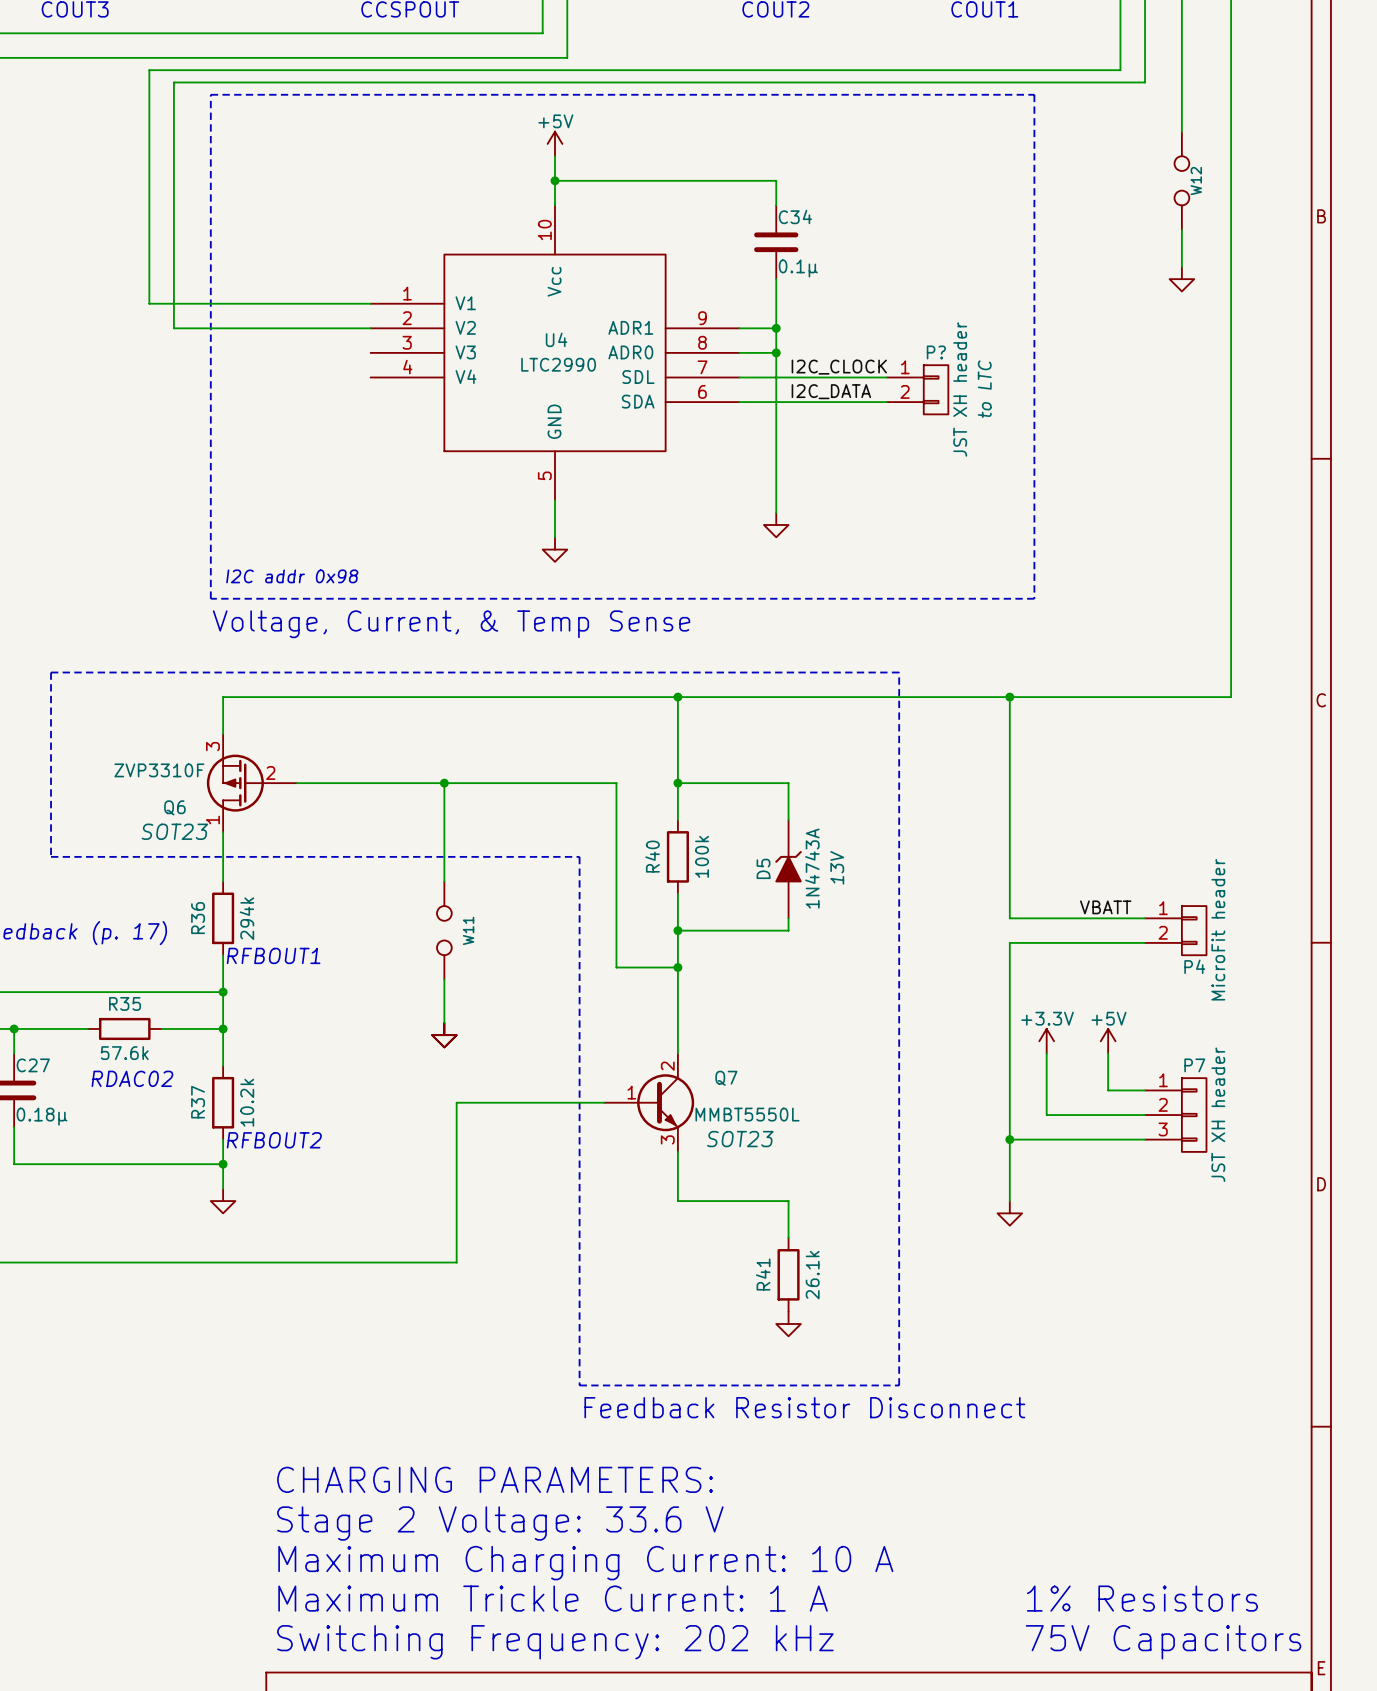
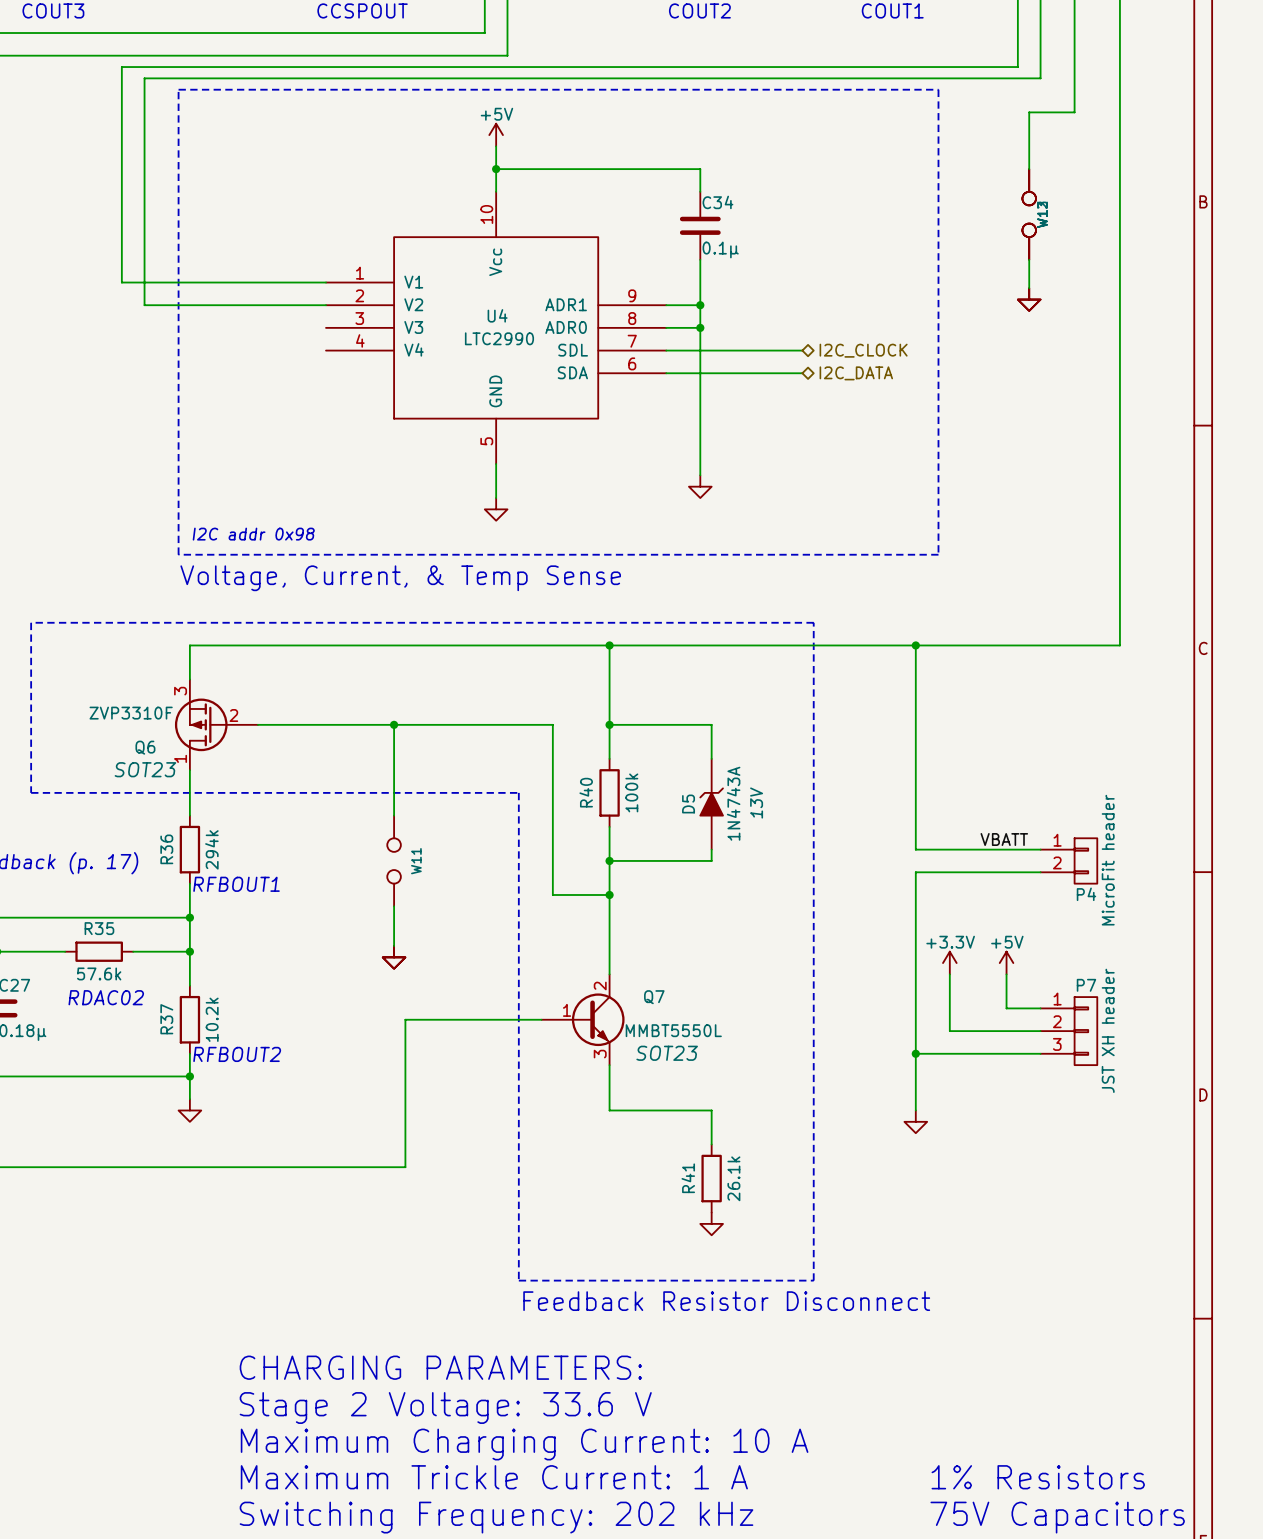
wire: (1181, 119) (1181, 131) -> (1074, 112) (1029, 112) (1029, 169)
W12 position: (1181, 180) -> (1029, 214)
part: none -> (1029, 214)
wire: (1181, 229) (1181, 266) -> none
wire: none -> (1029, 259) (1029, 288)
power symbol position: (1181, 279) -> (1029, 299)
label: I2C_CLOCK (839, 367) -> none
hierarchical label: none -> I2C_CLOCK (863, 350)
P?: JST XH header (917, 389) -> none
label: I2C_DATA (831, 391) -> none
hierarchical label: none -> I2C_DATA (856, 373)

